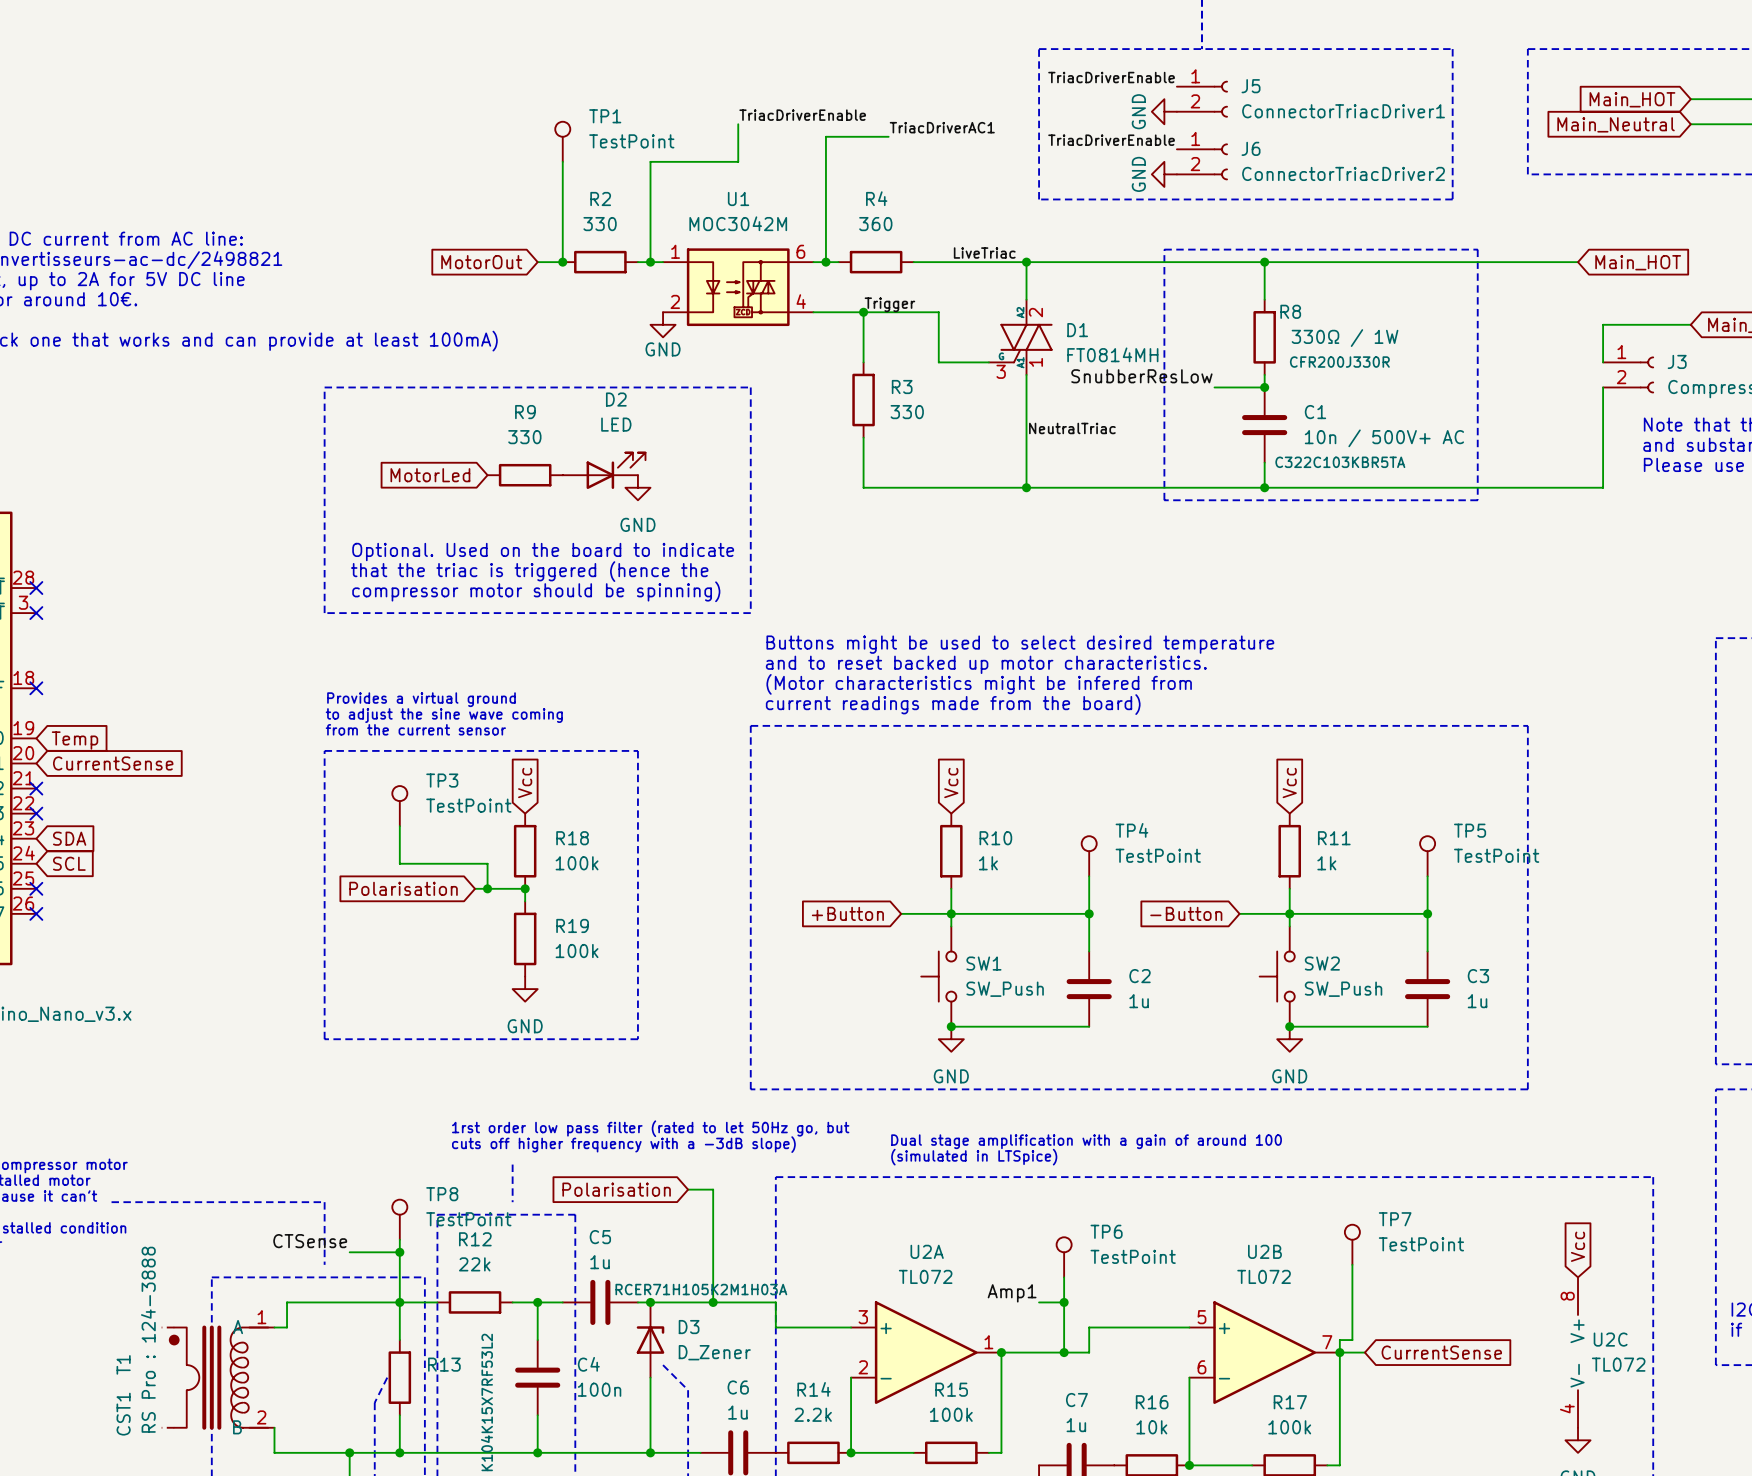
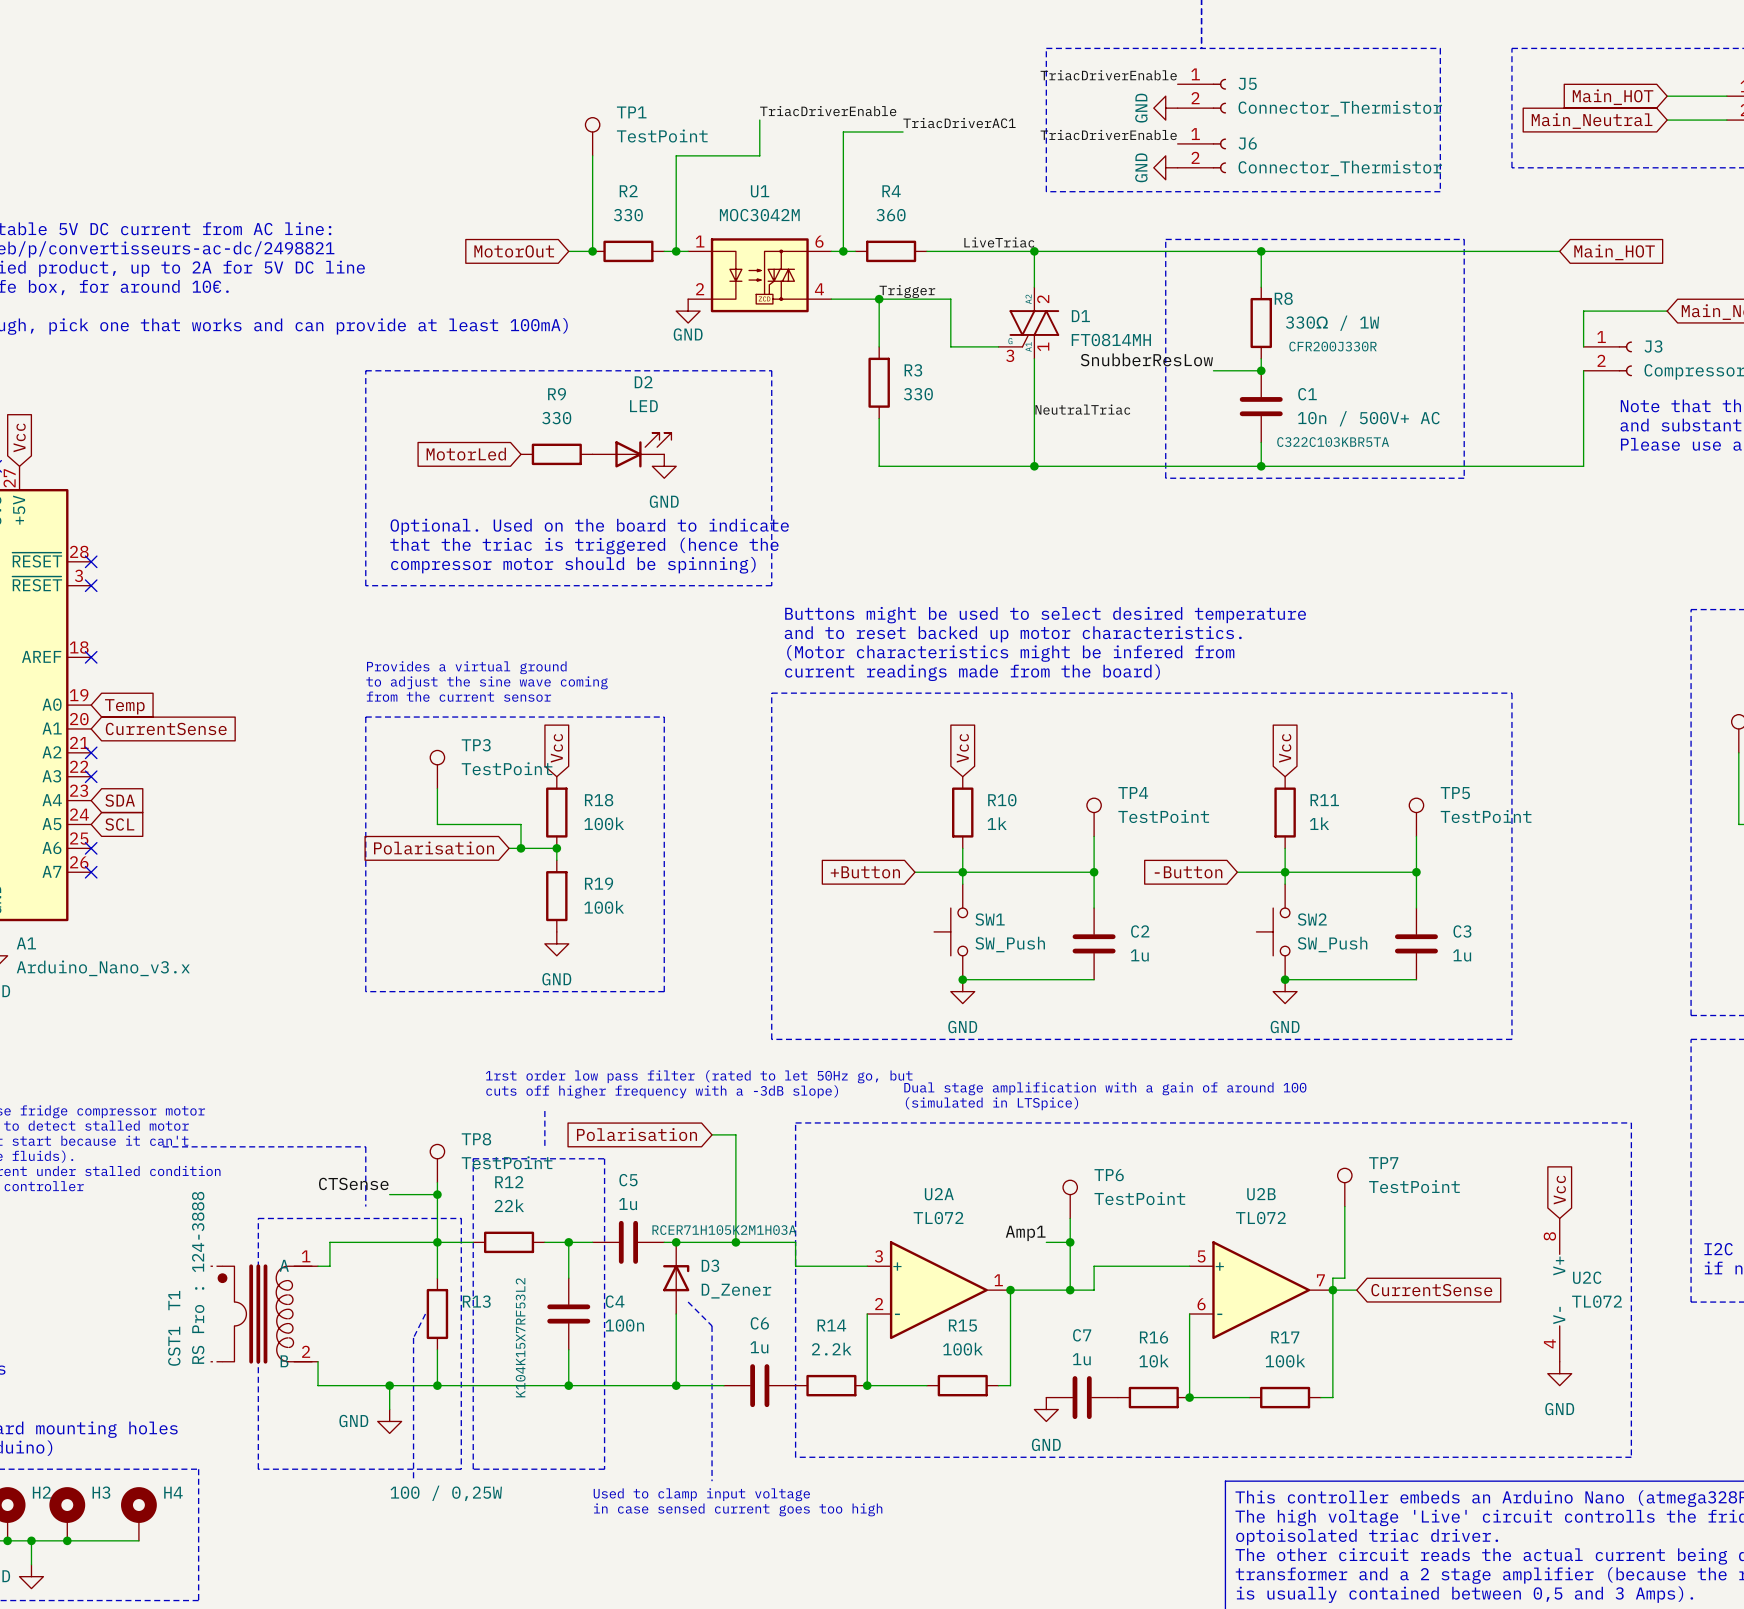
J5 value: ConnectorTriacDriver1 (1343, 111) -> Connector_Thermistor (1340, 108)
J6 value: ConnectorTriacDriver2 (1343, 173) -> Connector_Thermistor (1340, 168)

